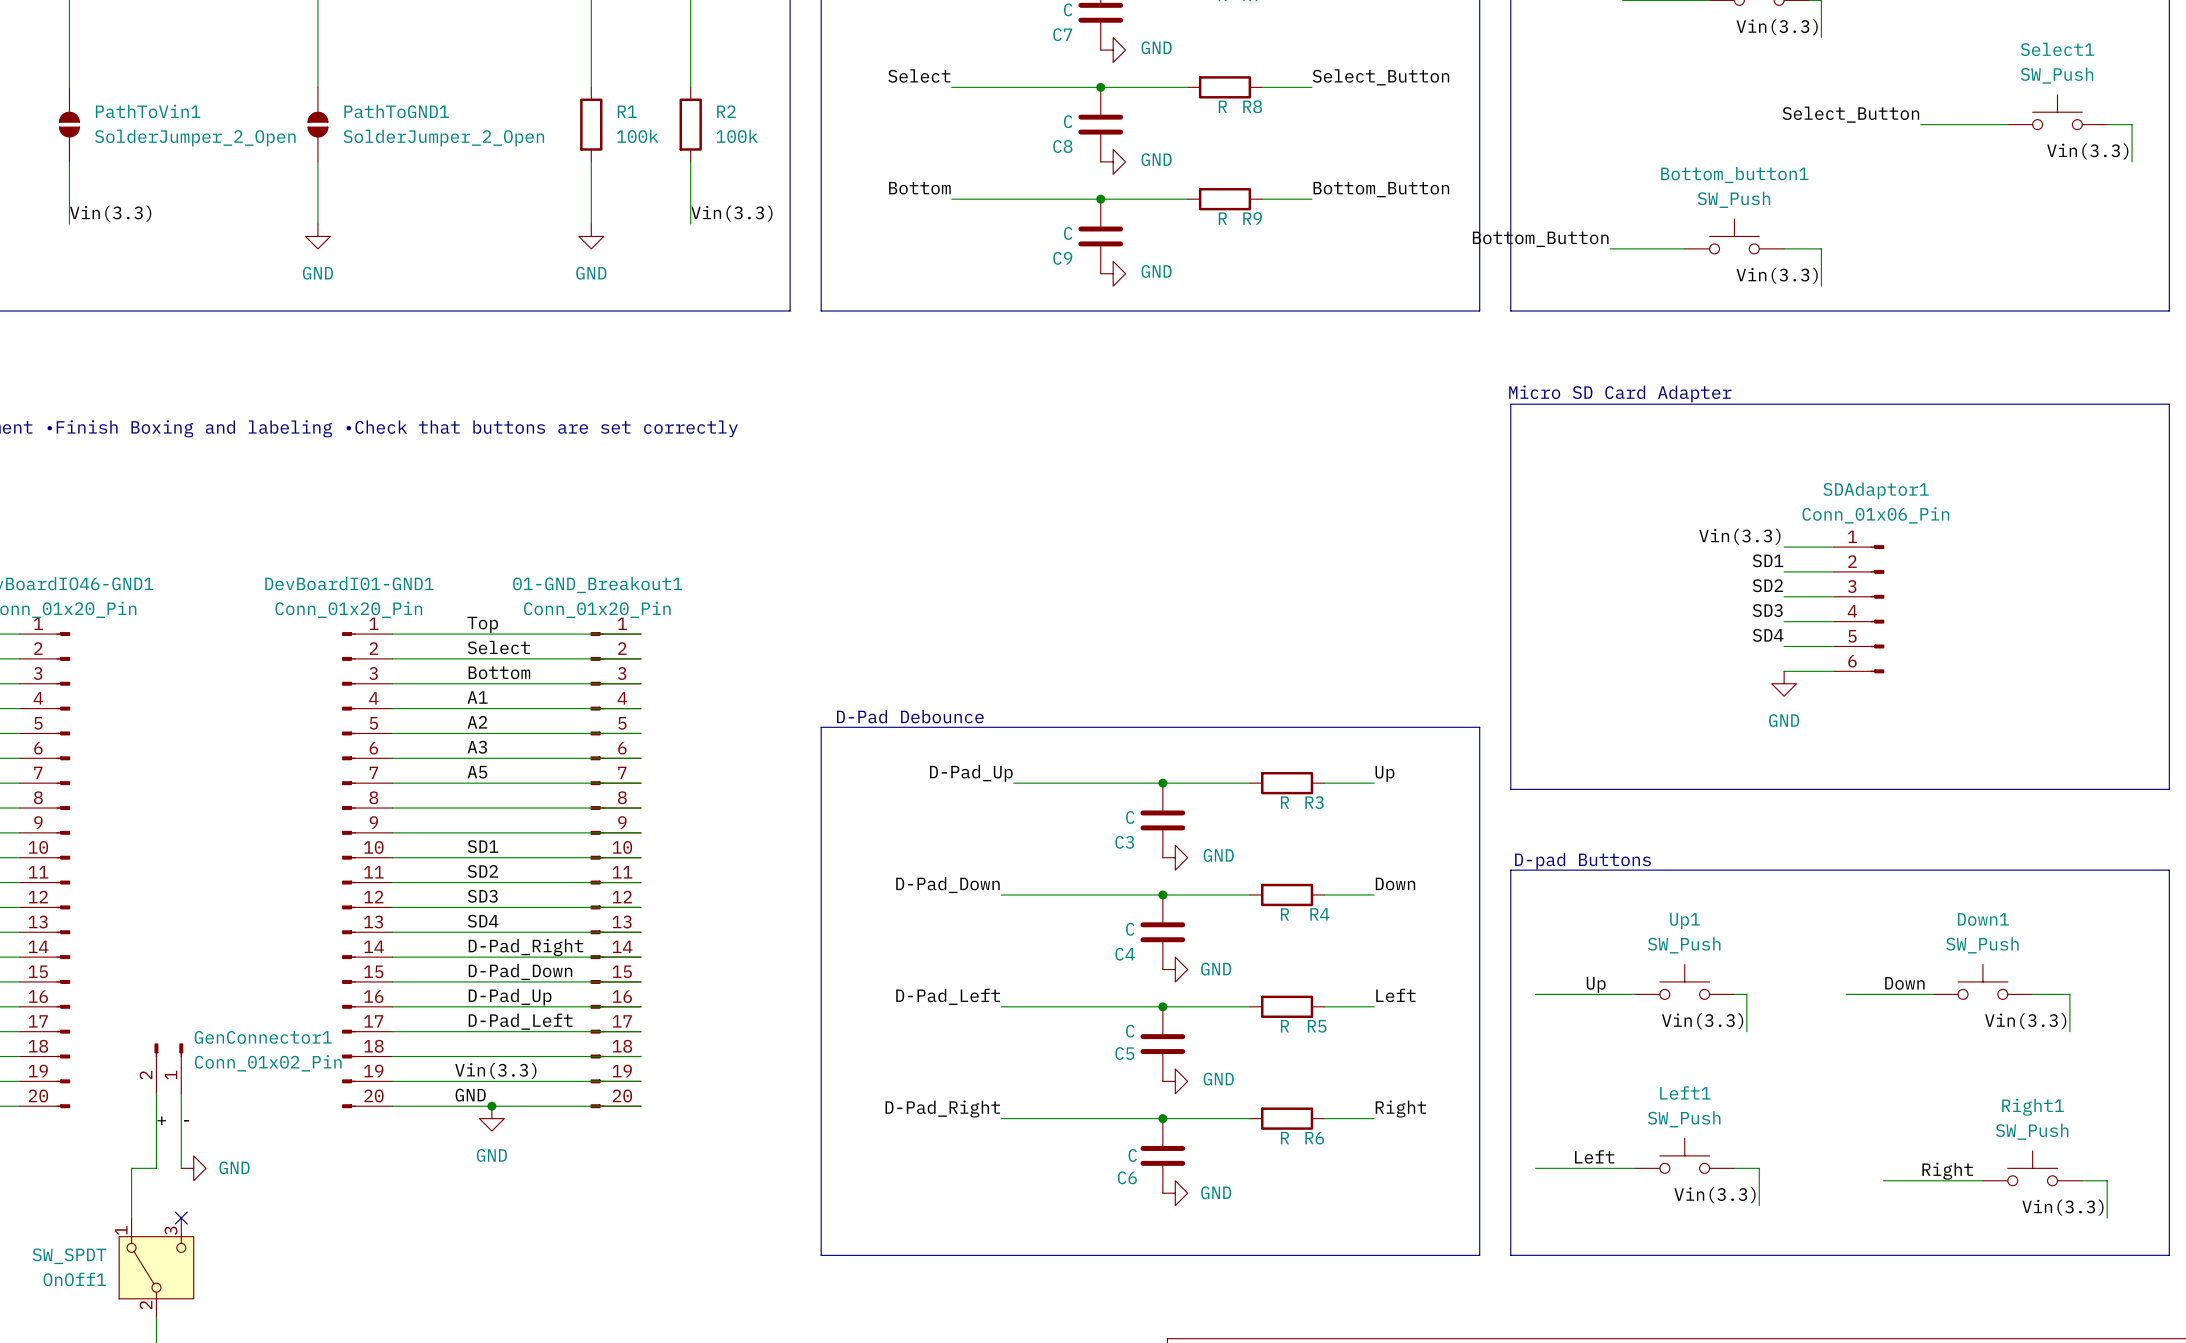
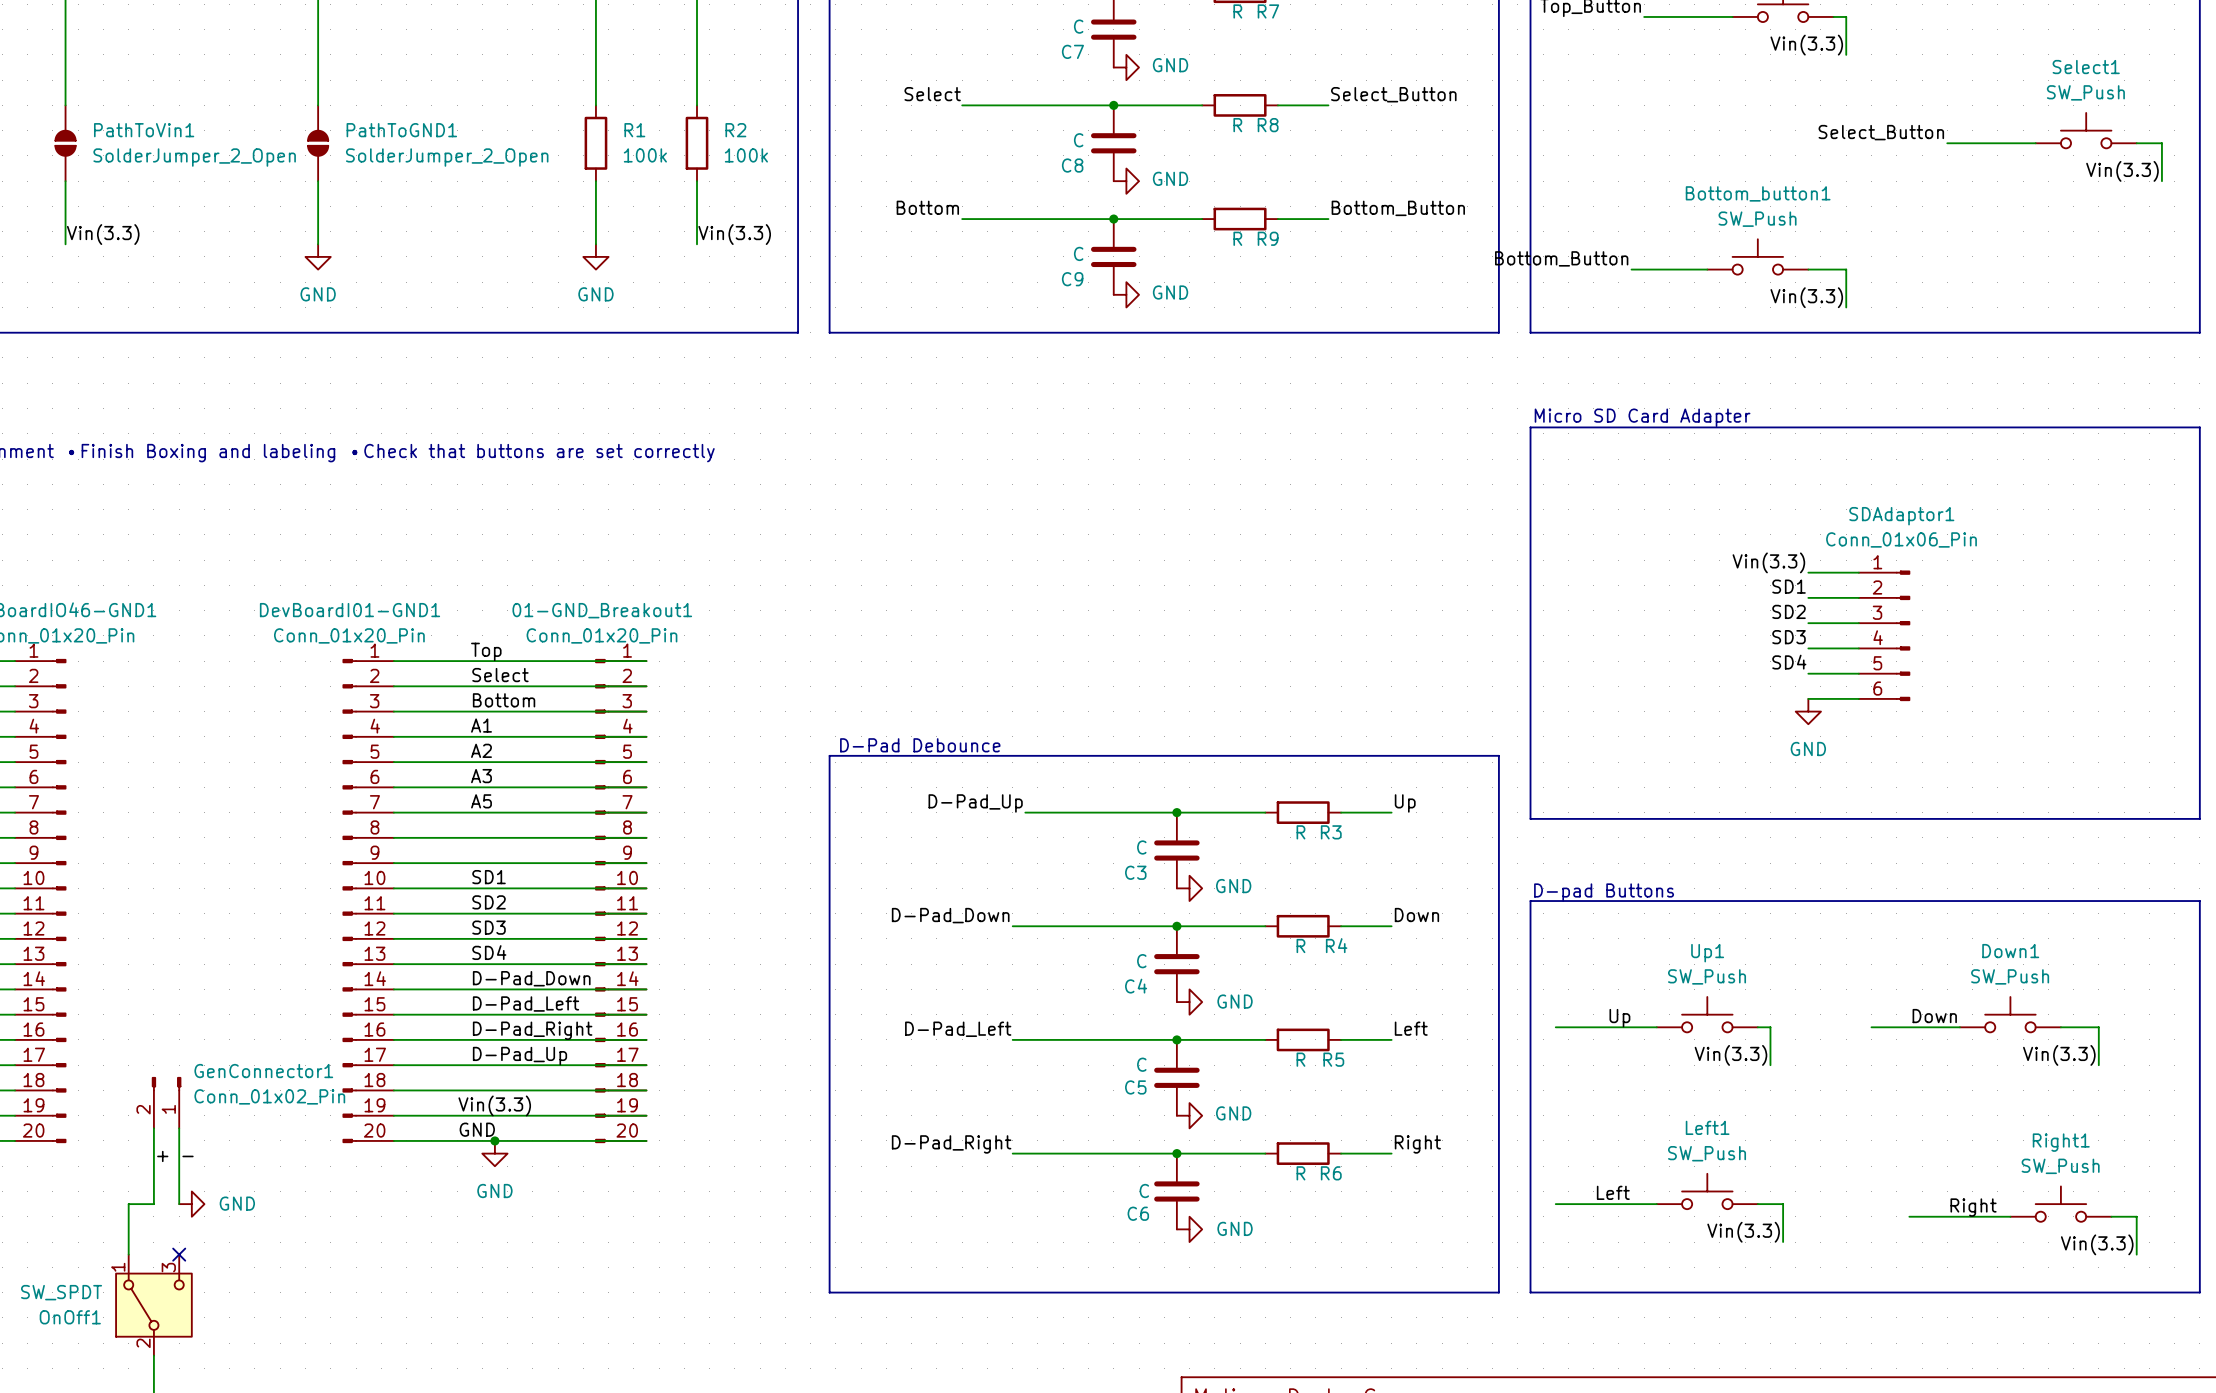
label: D-Pad_Right (525, 947) -> D-Pad_Down (531, 978)
label: D-Pad_Down (520, 972) -> D-Pad_Left (526, 1004)
label: D-Pad_Up (510, 997) -> D-Pad_Right (532, 1030)
label: D-Pad_Left (520, 1021) -> D-Pad_Up (519, 1056)

